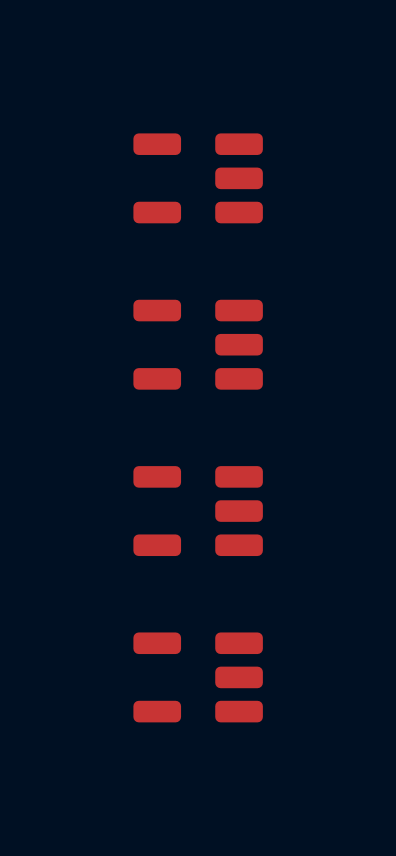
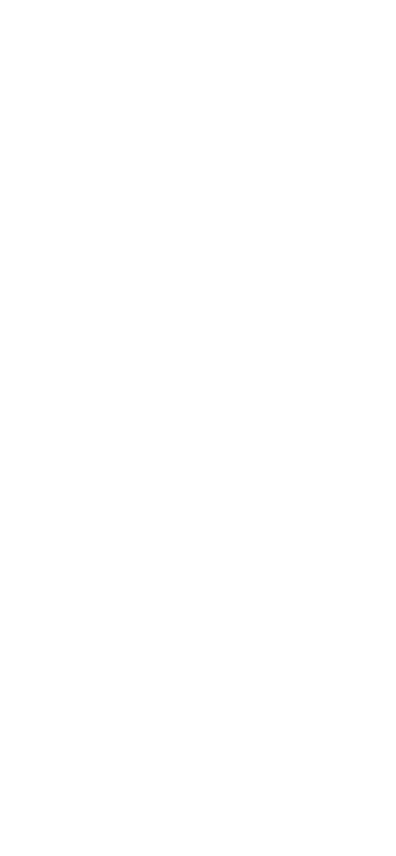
part: (198, 178) -> none
part: (198, 344) -> none
part: (198, 511) -> none
part: (198, 677) -> none

